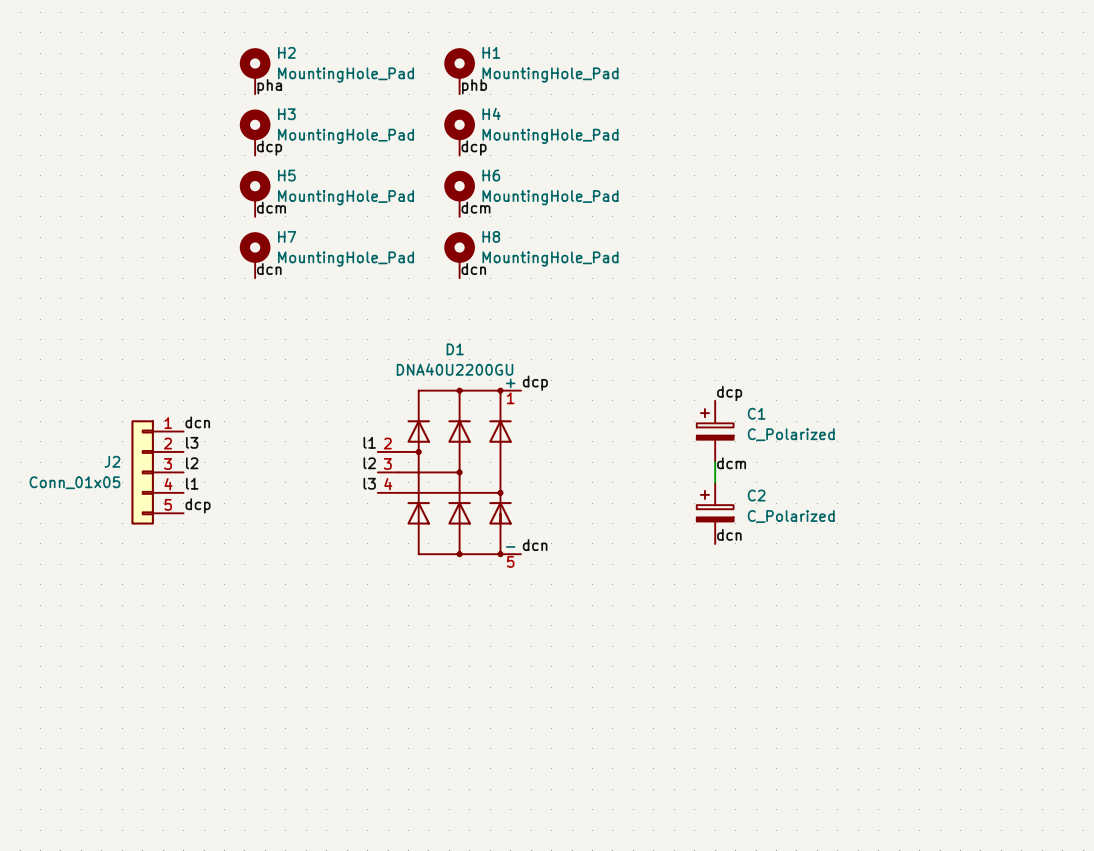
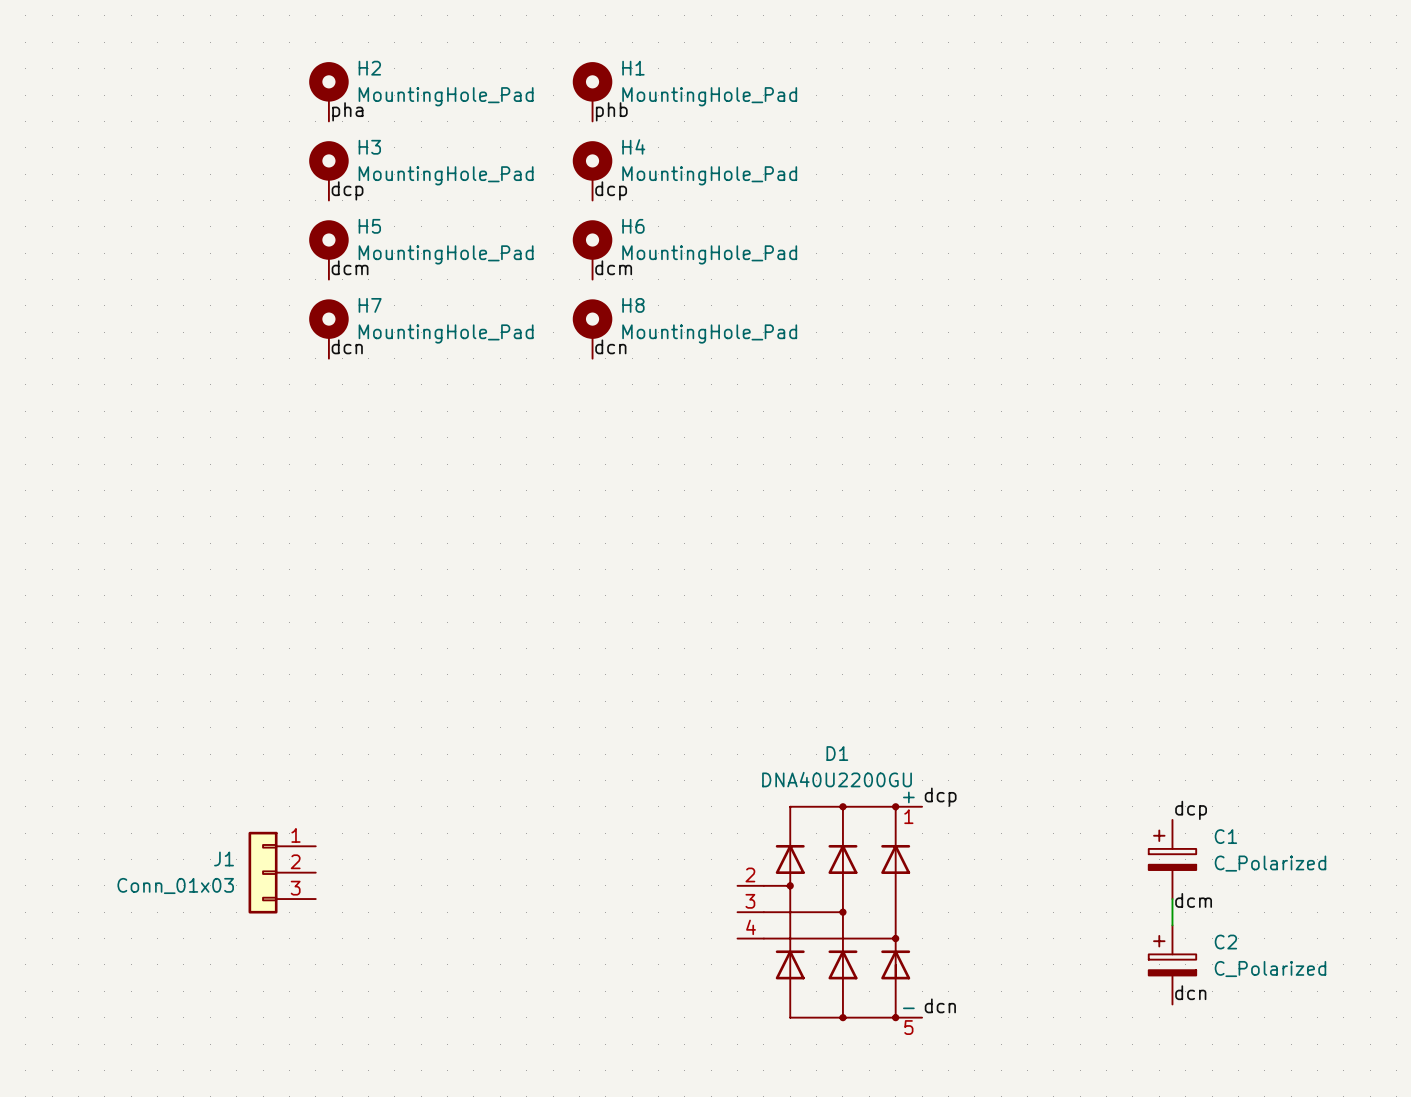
label: dcp (535, 383) -> none
label: dcp (729, 393) -> none
label: dcn (197, 422) -> none
C1 position: (715, 431) -> (1172, 859)
label: l3 (192, 442) -> none
label: l1 (369, 442) -> none
wire: (715, 462) (715, 482) -> none
label: l2 (192, 463) -> none
label: l2 (369, 463) -> none
label: dcm (731, 463) -> none
J2: Conn_01x05 (157, 472) -> none
D1 position: (449, 472) -> (829, 912)
label: l1 (192, 483) -> none
label: l3 (369, 483) -> none
label: dcp (198, 505) -> none
C2 position: (715, 513) -> (1172, 964)
label: dcn (729, 534) -> none
label: dcn (535, 545) -> none
label: none -> dcp (940, 797)
label: none -> dcp (1191, 810)
J1: none -> Conn_01x03 (282, 872)
wire: none -> (1172, 899) (1172, 925)
label: none -> dcm (1193, 900)
label: none -> dcn (1190, 992)
label: none -> dcn (940, 1005)

